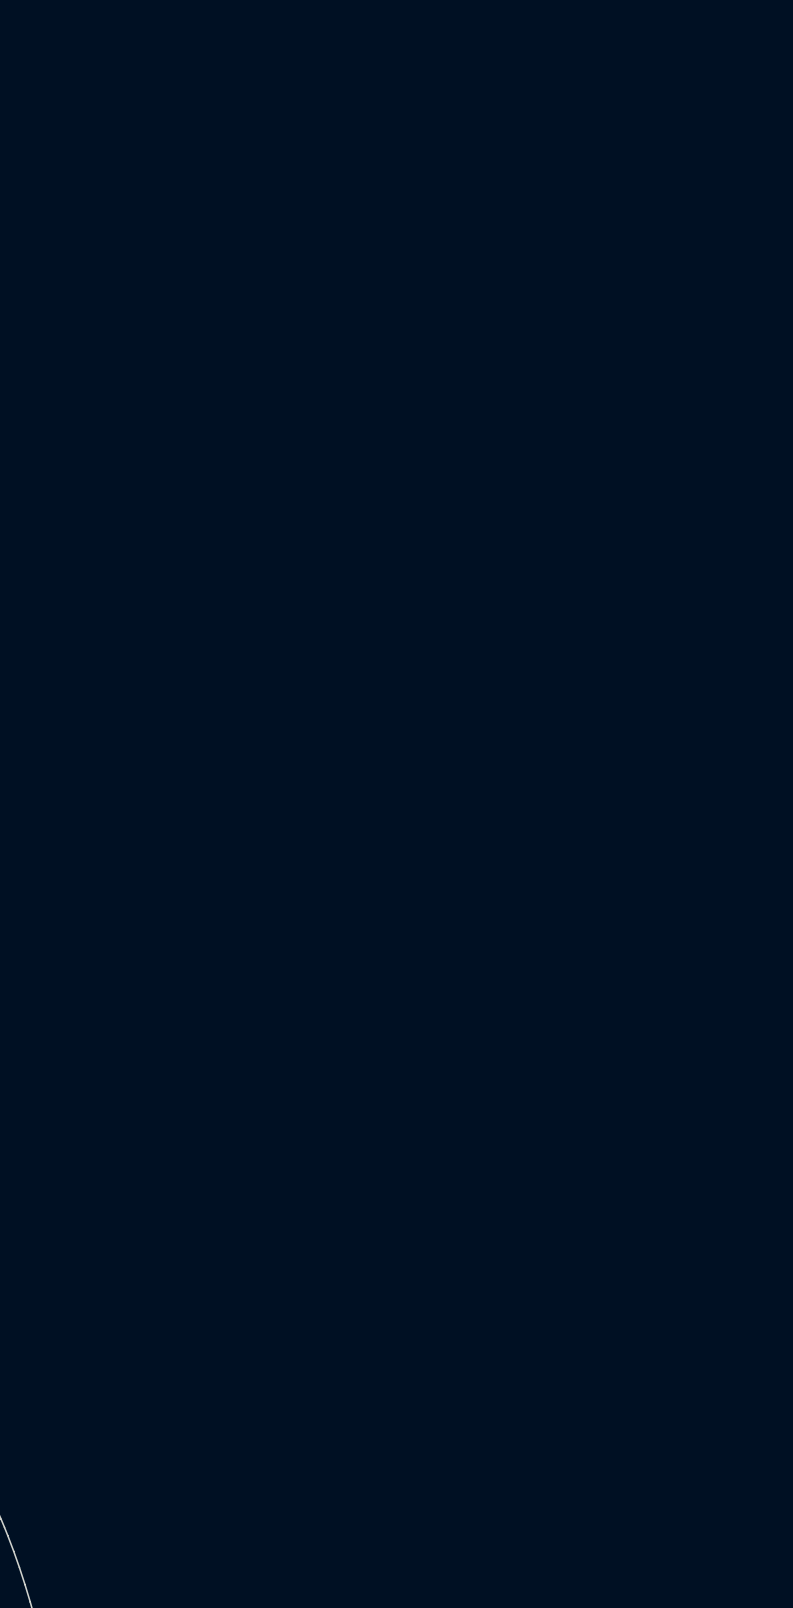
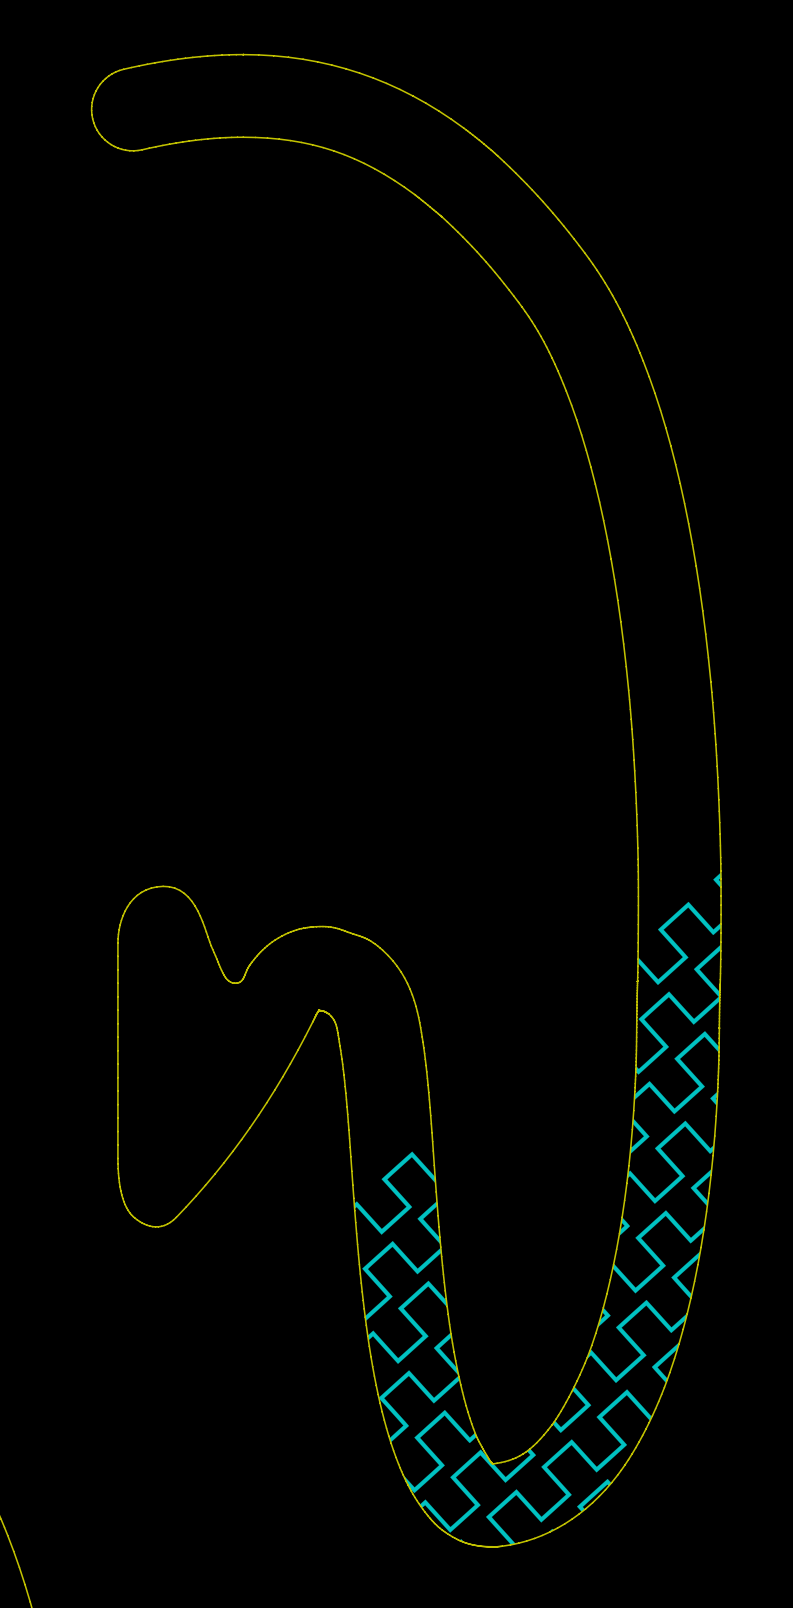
drawing: none -> [354, 872, 722, 1546]
board edge: none -> (637, 981) (638, 865) (635, 781) (628, 690) (617, 600) (603, 520) (586, 450) (566, 391) (546, 346) (513, 295) (462, 236) (414, 194) (364, 163) (323, 147) (267, 138) (207, 138) (133, 150) (121, 149) (107, 142) (97, 130) (92, 118) (92, 102) (97, 87) (105, 78) (115, 71) (154, 62) (200, 56) (243, 54) (288, 57) (317, 61) (345, 68) (386, 83) (426, 103) (463, 128) (498, 156) (537, 195) (574, 238) (601, 276) (619, 308) (639, 352) (654, 393) (670, 445) (684, 503) (699, 588) (710, 682) (717, 777) (721, 887) (718, 1056) (716, 1116) (708, 1193) (697, 1264) (683, 1329) (667, 1380) (649, 1422) (628, 1459) (605, 1489) (579, 1514) (542, 1535) (518, 1543) (496, 1546) (475, 1545) (458, 1539) (439, 1528) (426, 1514) (413, 1494) (400, 1467) (382, 1411) (367, 1336) (358, 1254) (345, 1086) (338, 1035) (333, 1019) (323, 1011)
board edge: none -> (637, 981) (635, 1079) (628, 1165) (616, 1249) (599, 1320) (579, 1375) (551, 1425) (536, 1442) (523, 1453) (508, 1460) (492, 1463)
board edge: none -> (318, 1010) (282, 1077) (250, 1127) (214, 1174) (176, 1217) (164, 1225) (149, 1226) (133, 1216) (123, 1201) (120, 1186) (117, 1163) (118, 938) (123, 915) (133, 898) (146, 889) (156, 886) (169, 886) (184, 893) (197, 911) (223, 974) (232, 982) (242, 980) (252, 961) (269, 943) (285, 934) (299, 929) (316, 926) (333, 927) (363, 937) (375, 944) (393, 960) (404, 977) (412, 995) (418, 1017) (427, 1078) (441, 1256) (452, 1343) (469, 1418) (477, 1437) (491, 1462)

